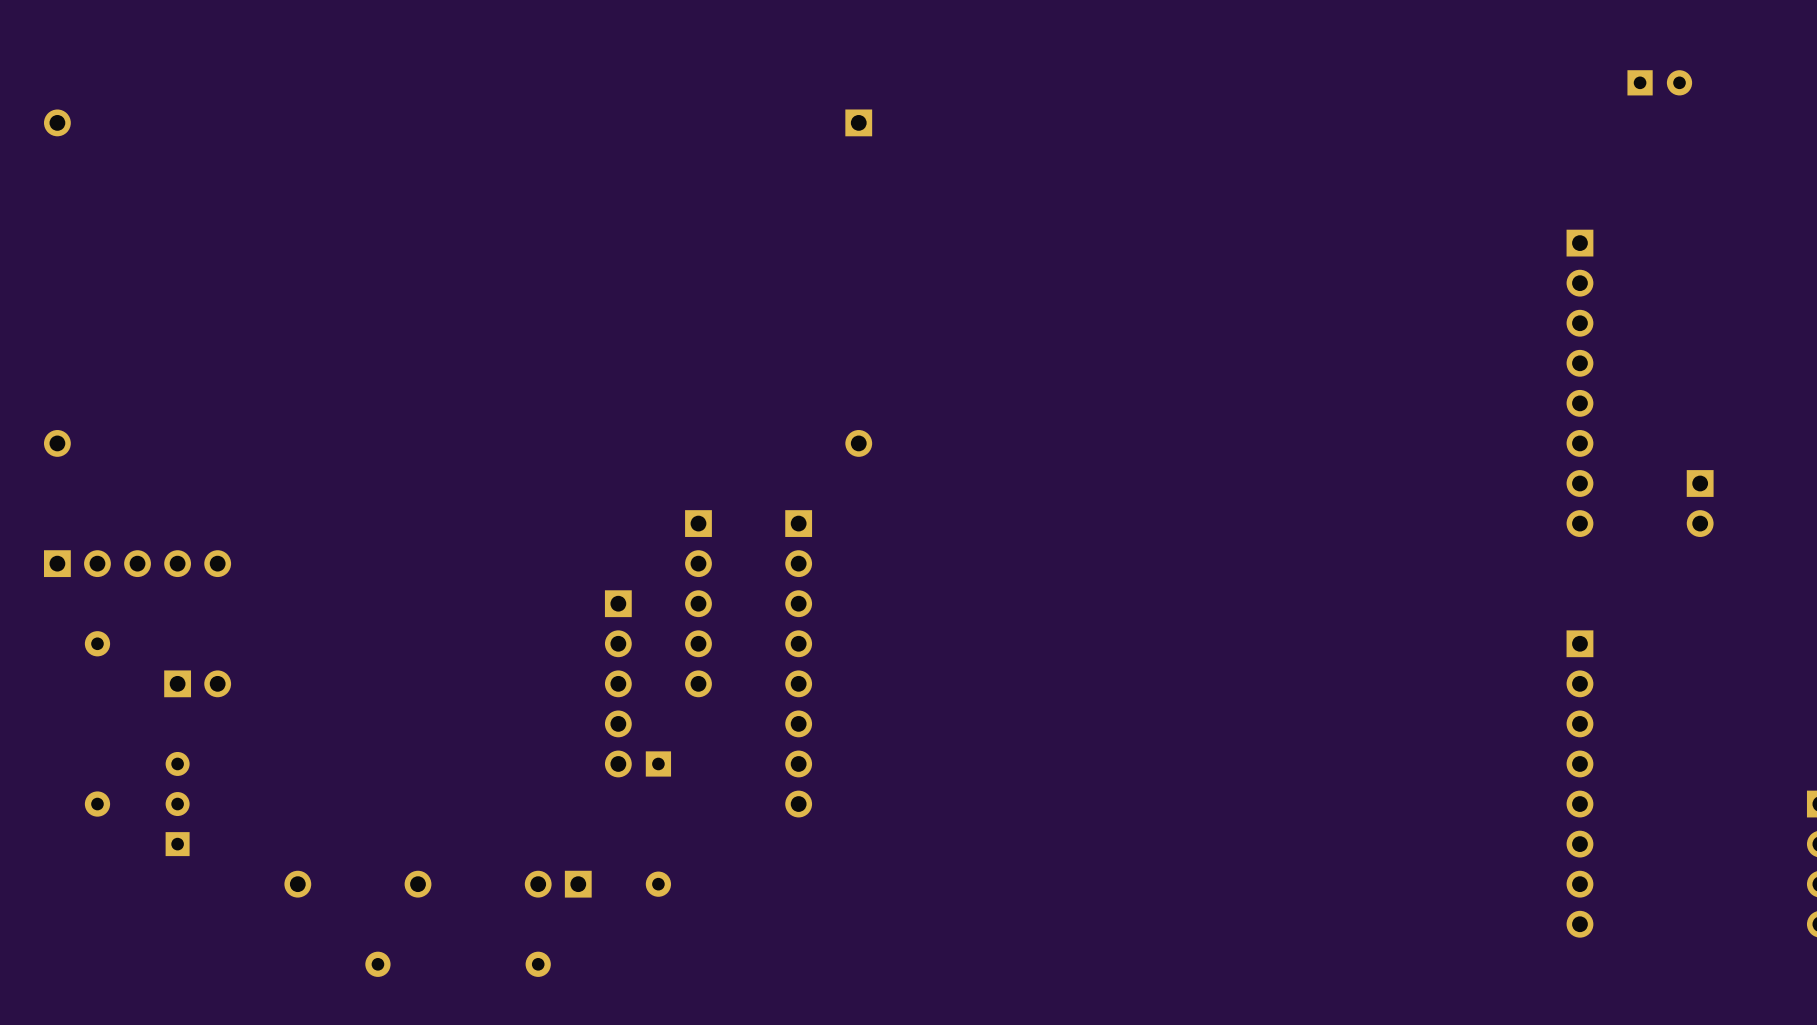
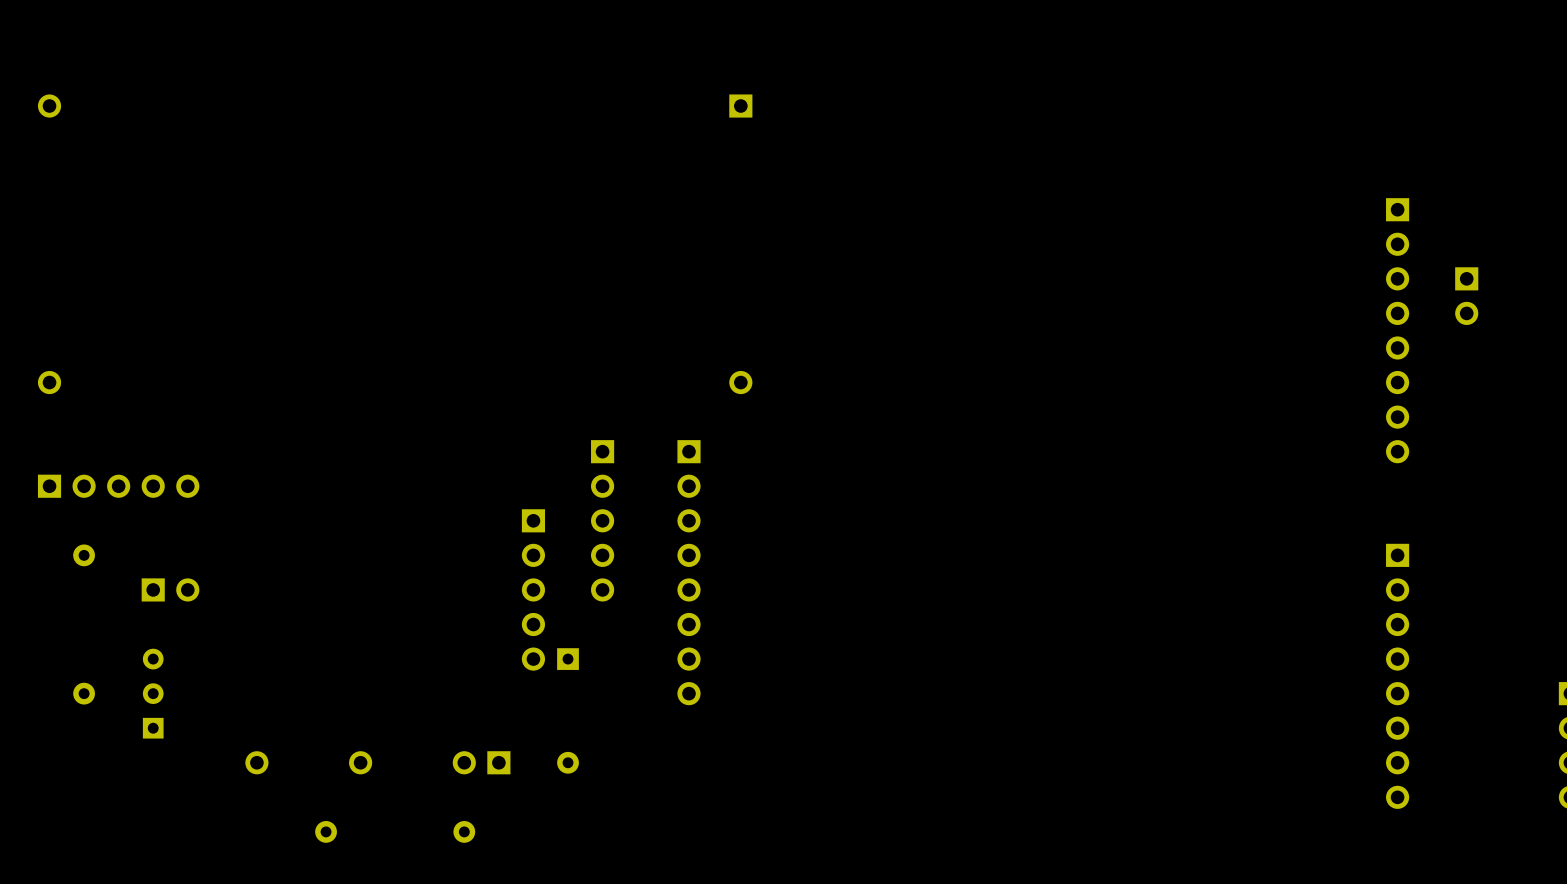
part: (1659, 82) -> none
part position: (1579, 383) -> (1397, 330)
part position: (1700, 503) -> (1466, 296)
part position: (1579, 784) -> (1397, 676)

